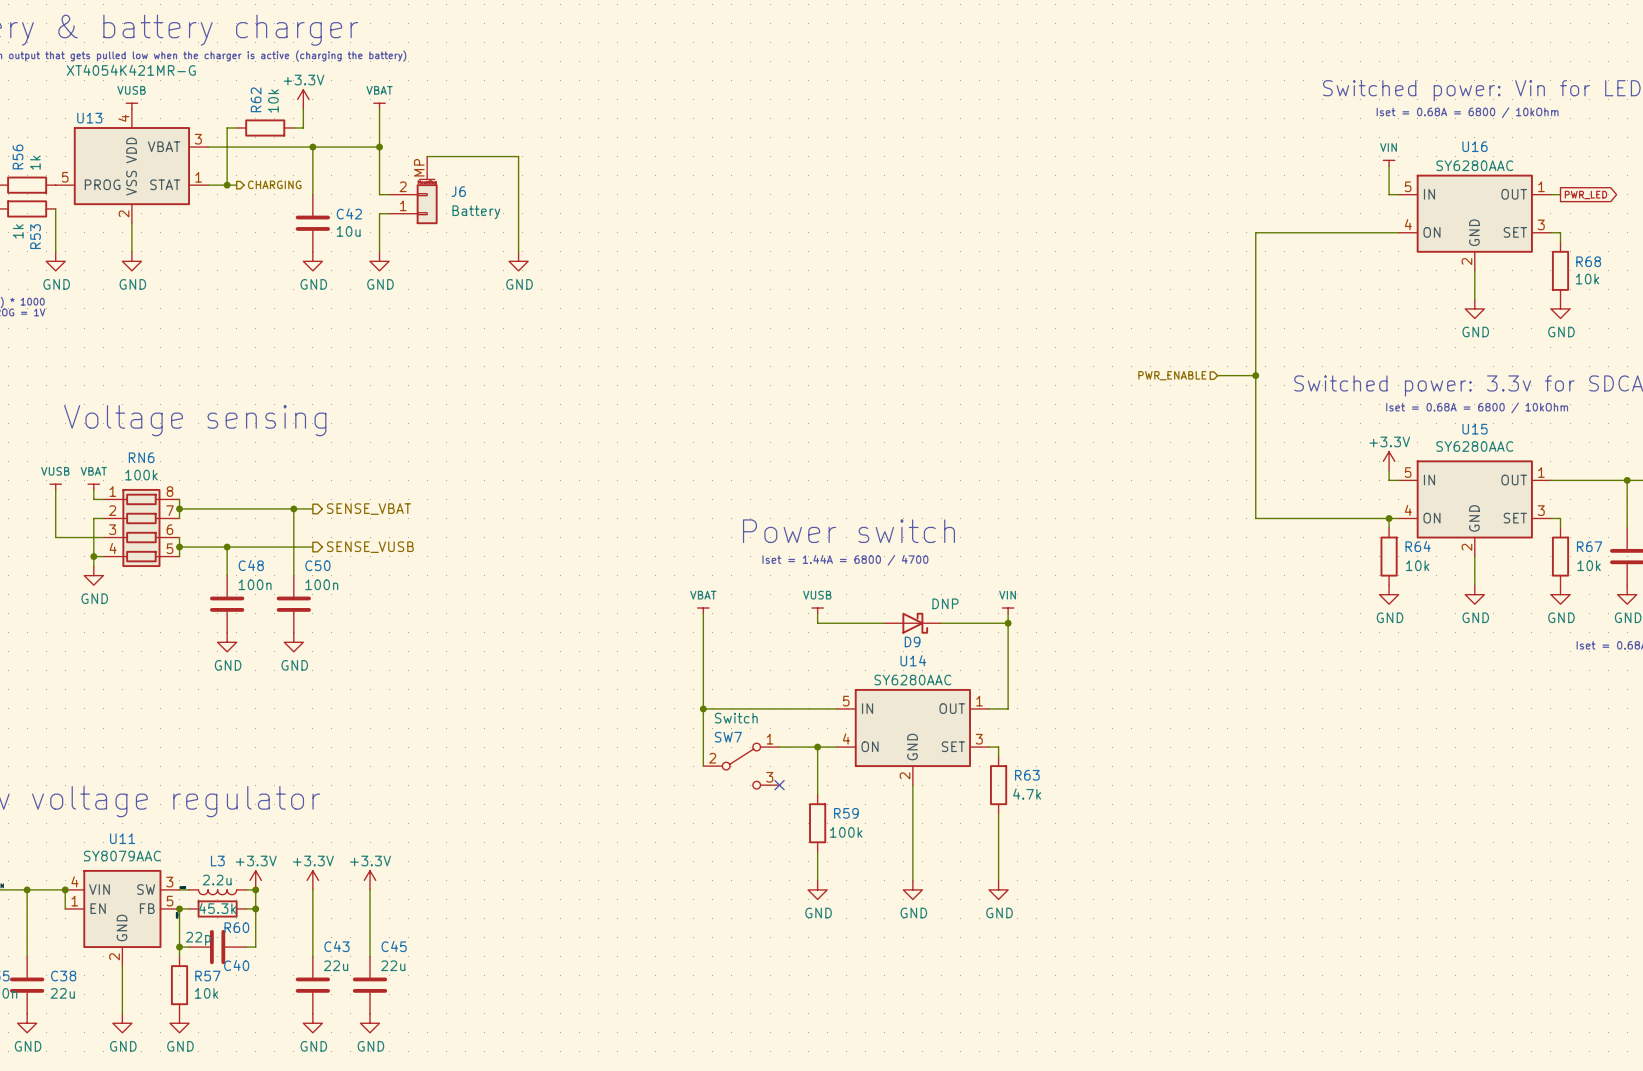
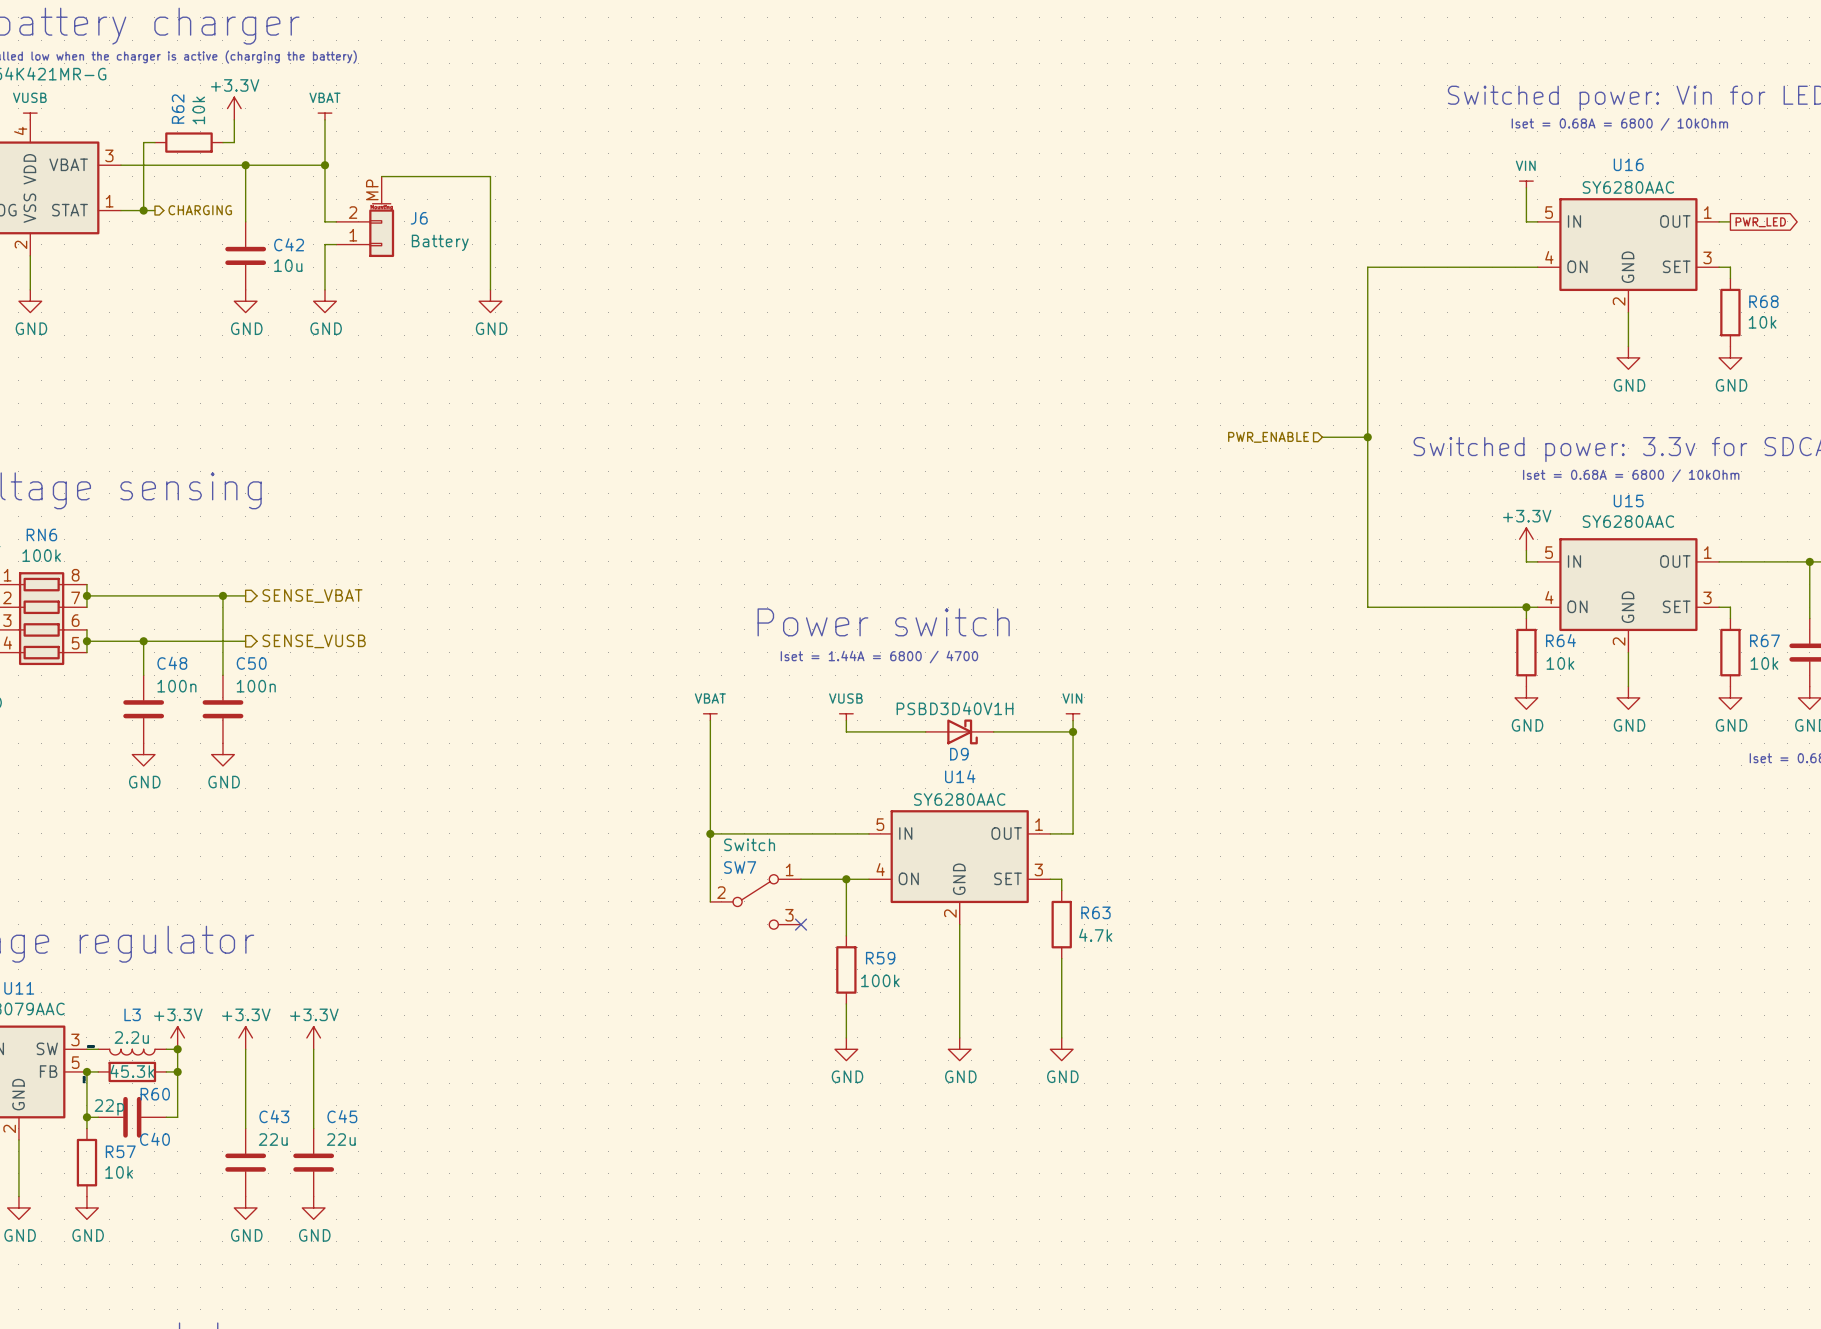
D9 value: DNP (945, 603) -> PSBD3D40V1H (955, 708)

